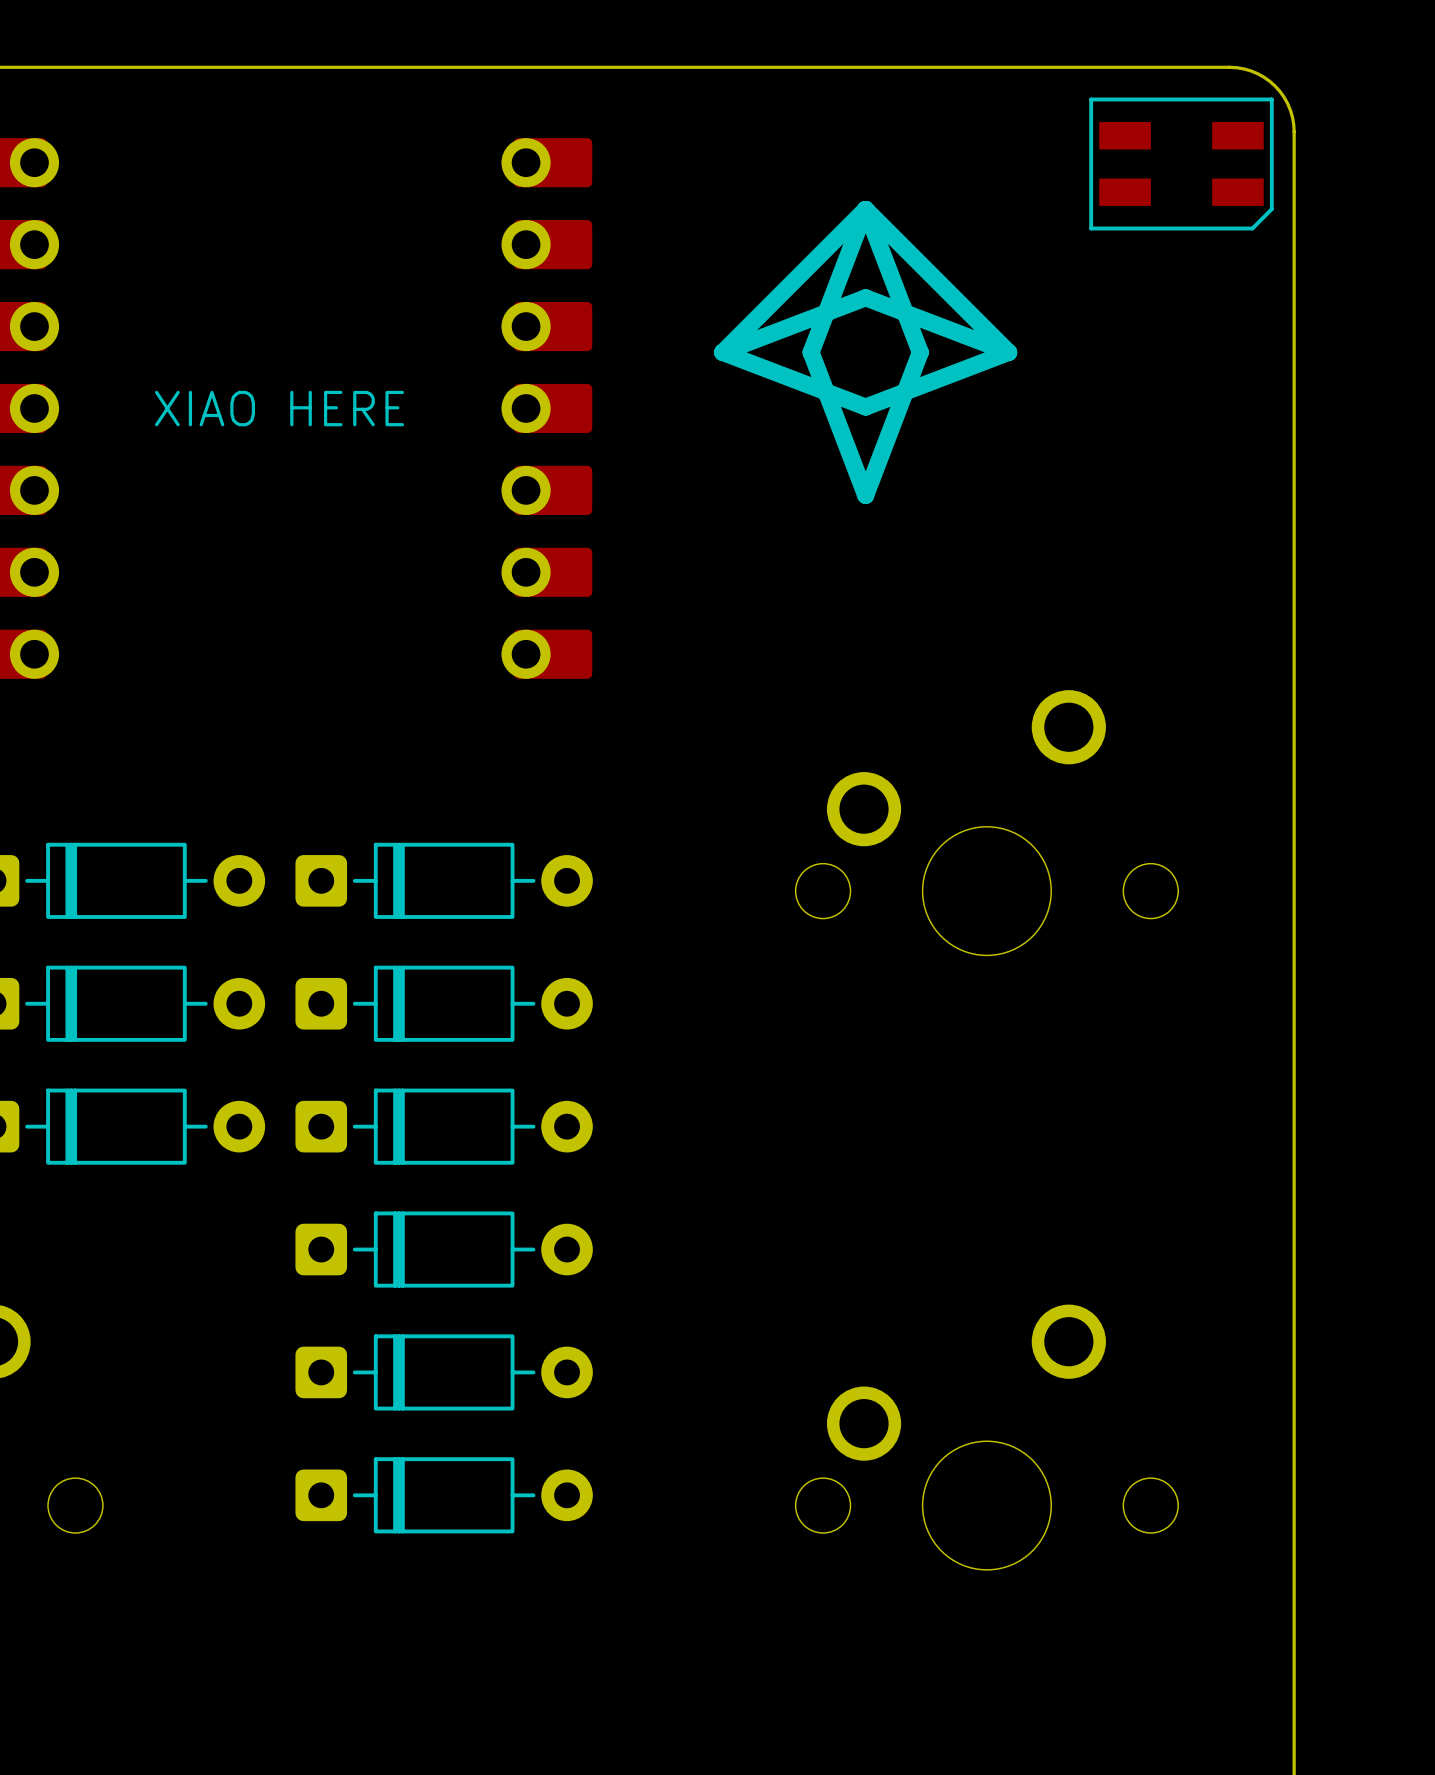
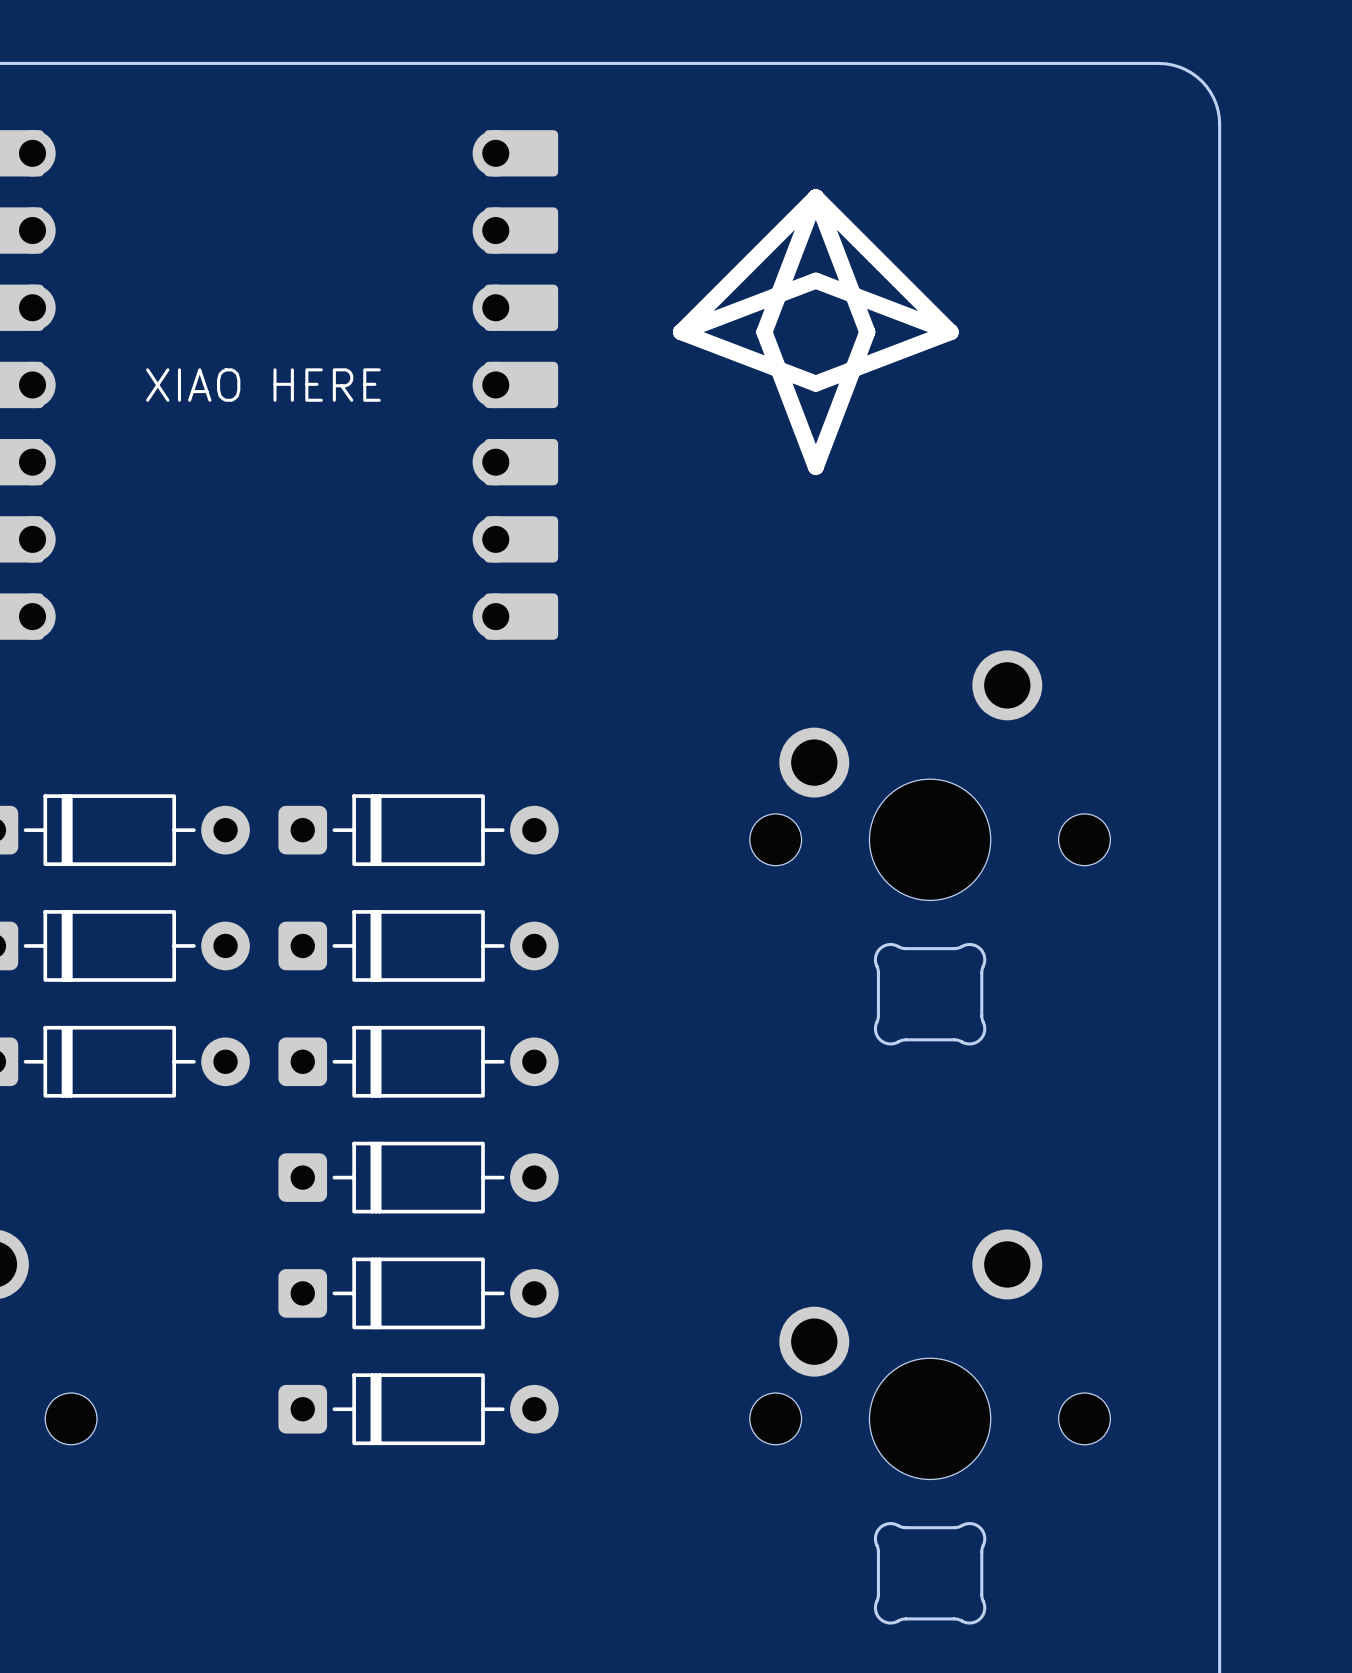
part: (1181, 163) -> none
part: none -> (930, 994)
part: none -> (930, 1573)

